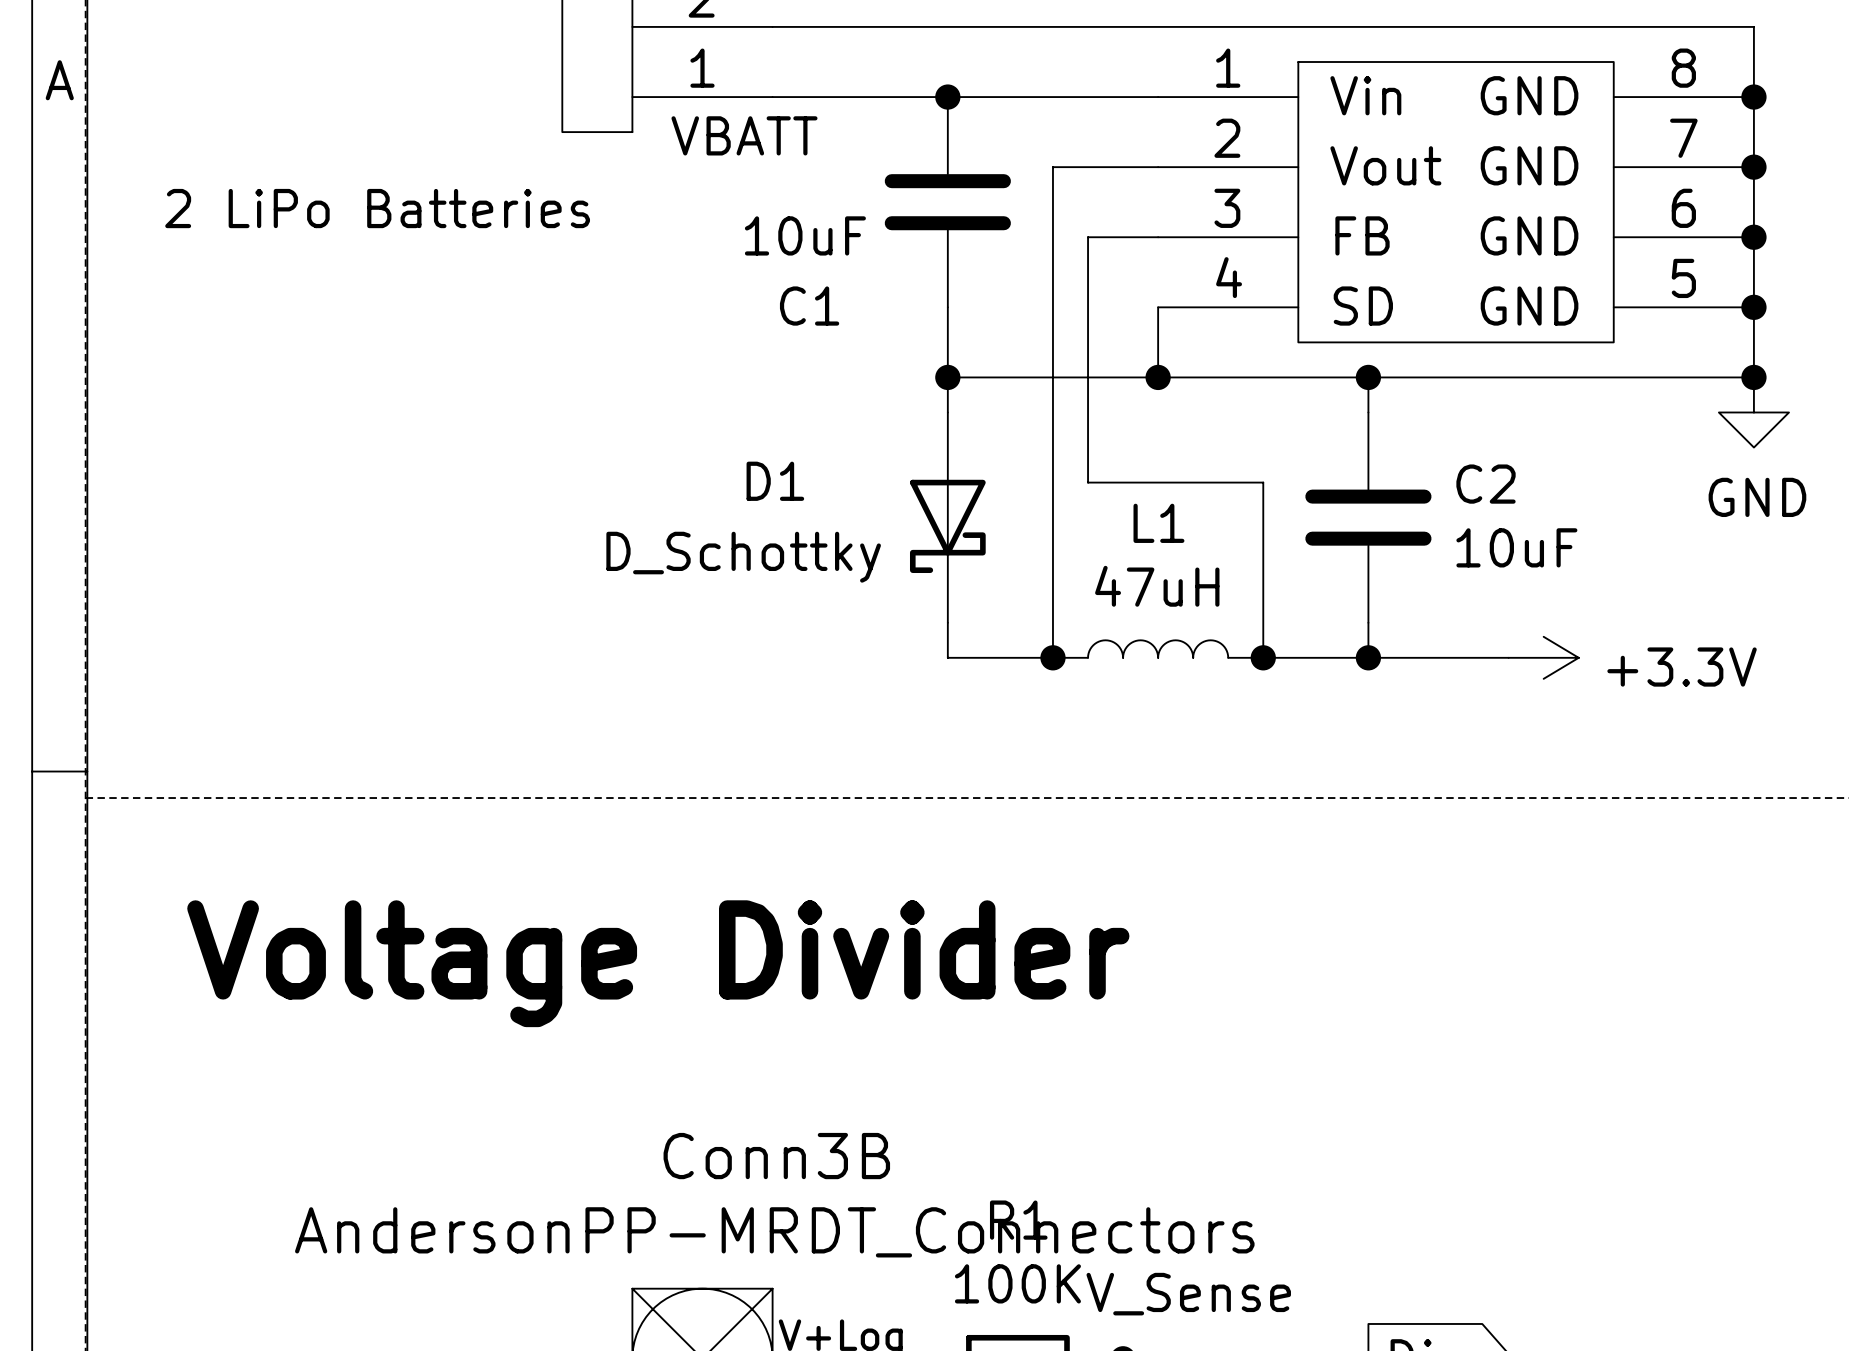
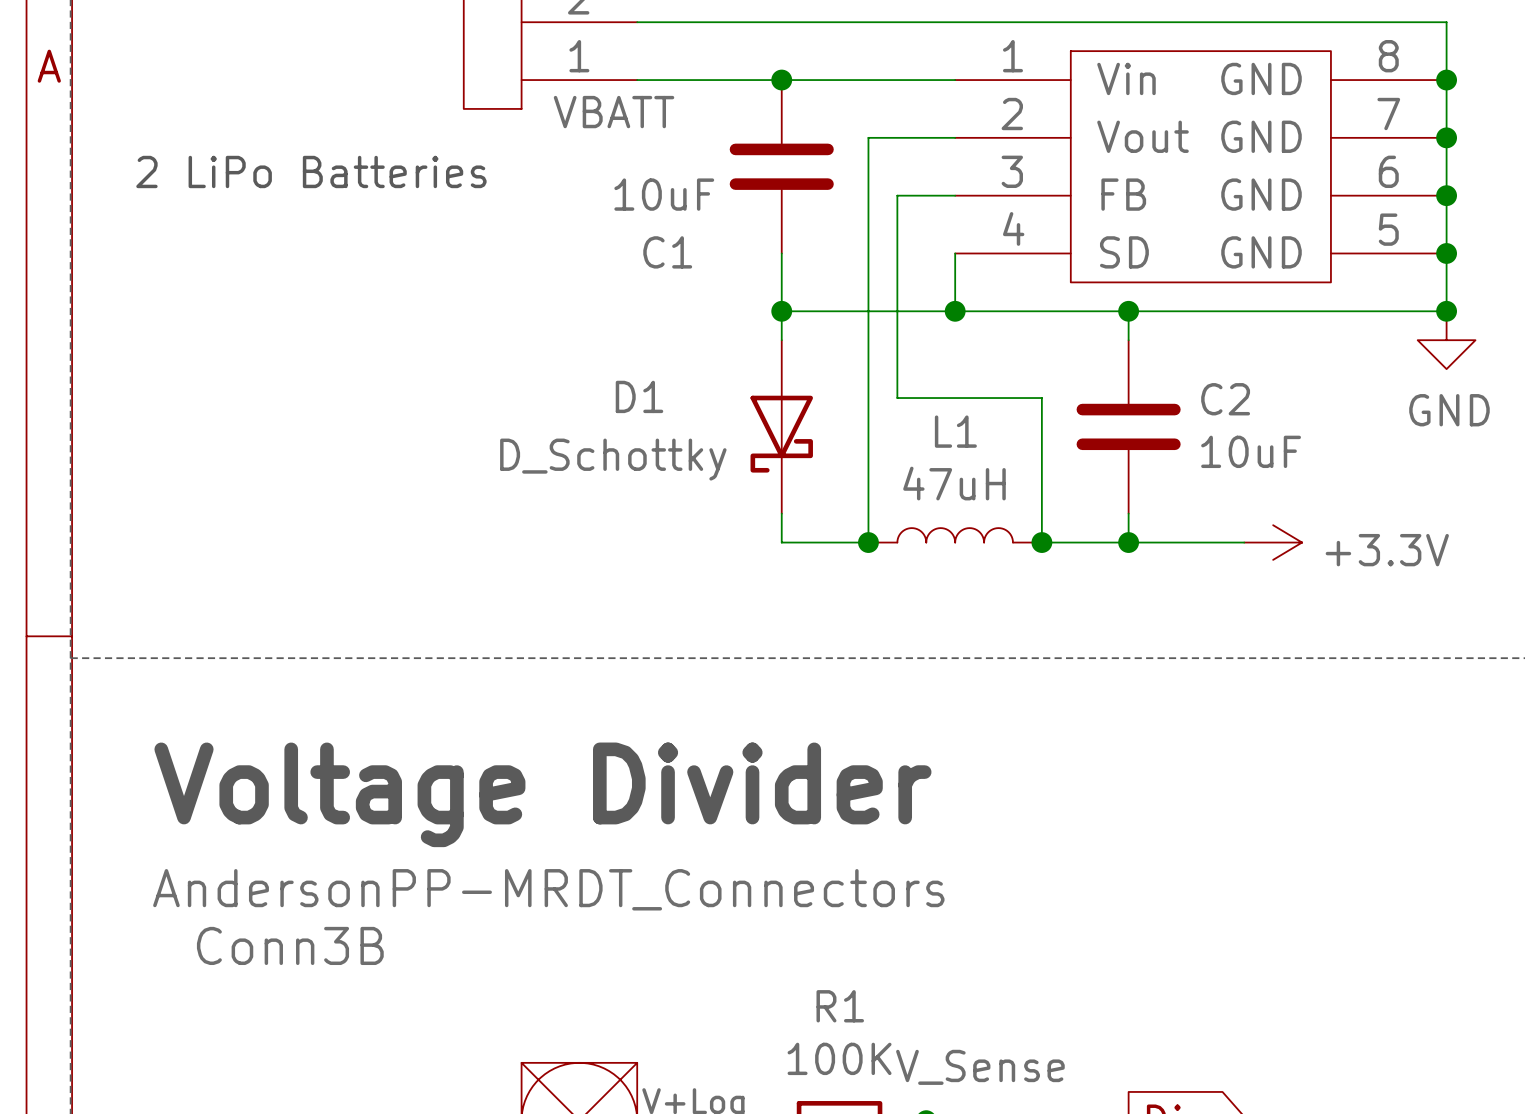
Conn3B name position: Conn3B (776, 1156) -> Conn3B (290, 945)
Conn3B value position: AndersonPP-MRDT_Connectors (774, 1232) -> AndersonPP-MRDT_Connectors (548, 889)

